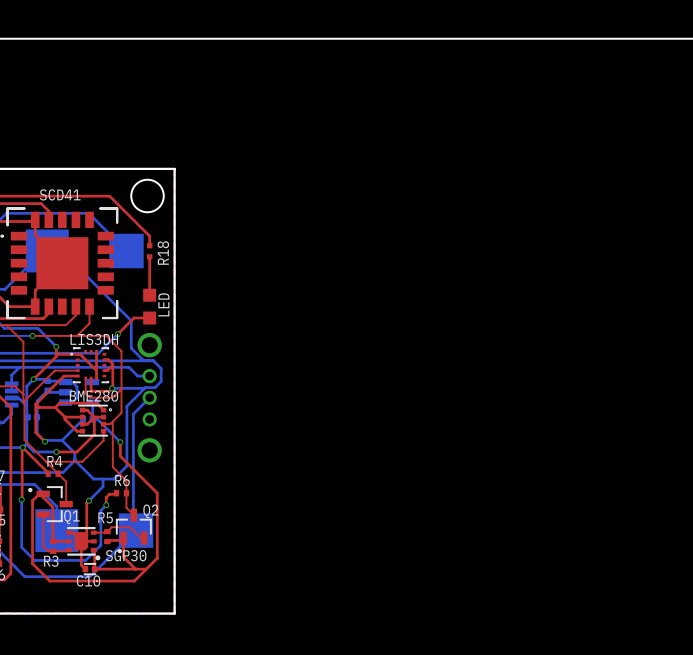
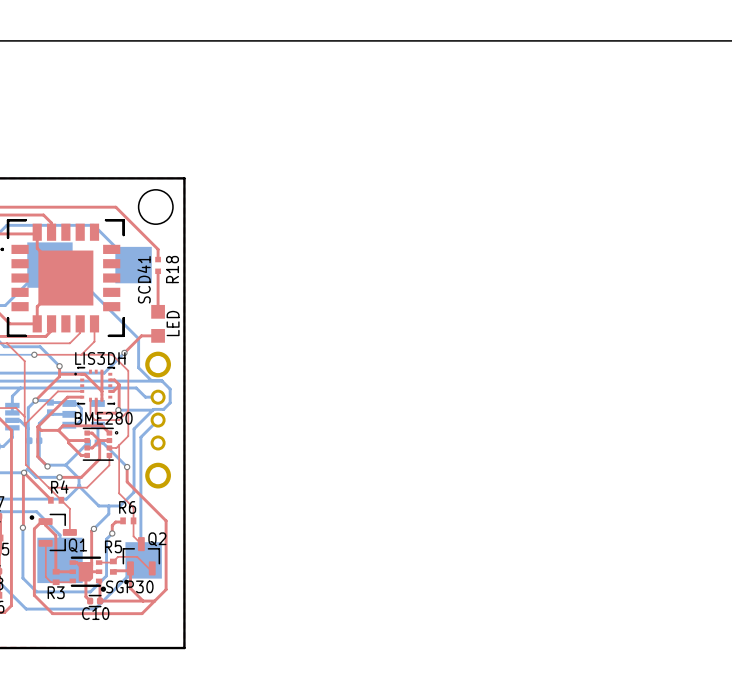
SCD41 name rotation: 0° (60, 194) -> 90° counterclockwise (144, 279)
SCD41 name position: SCD41 (60, 194) -> SCD41 (144, 279)

